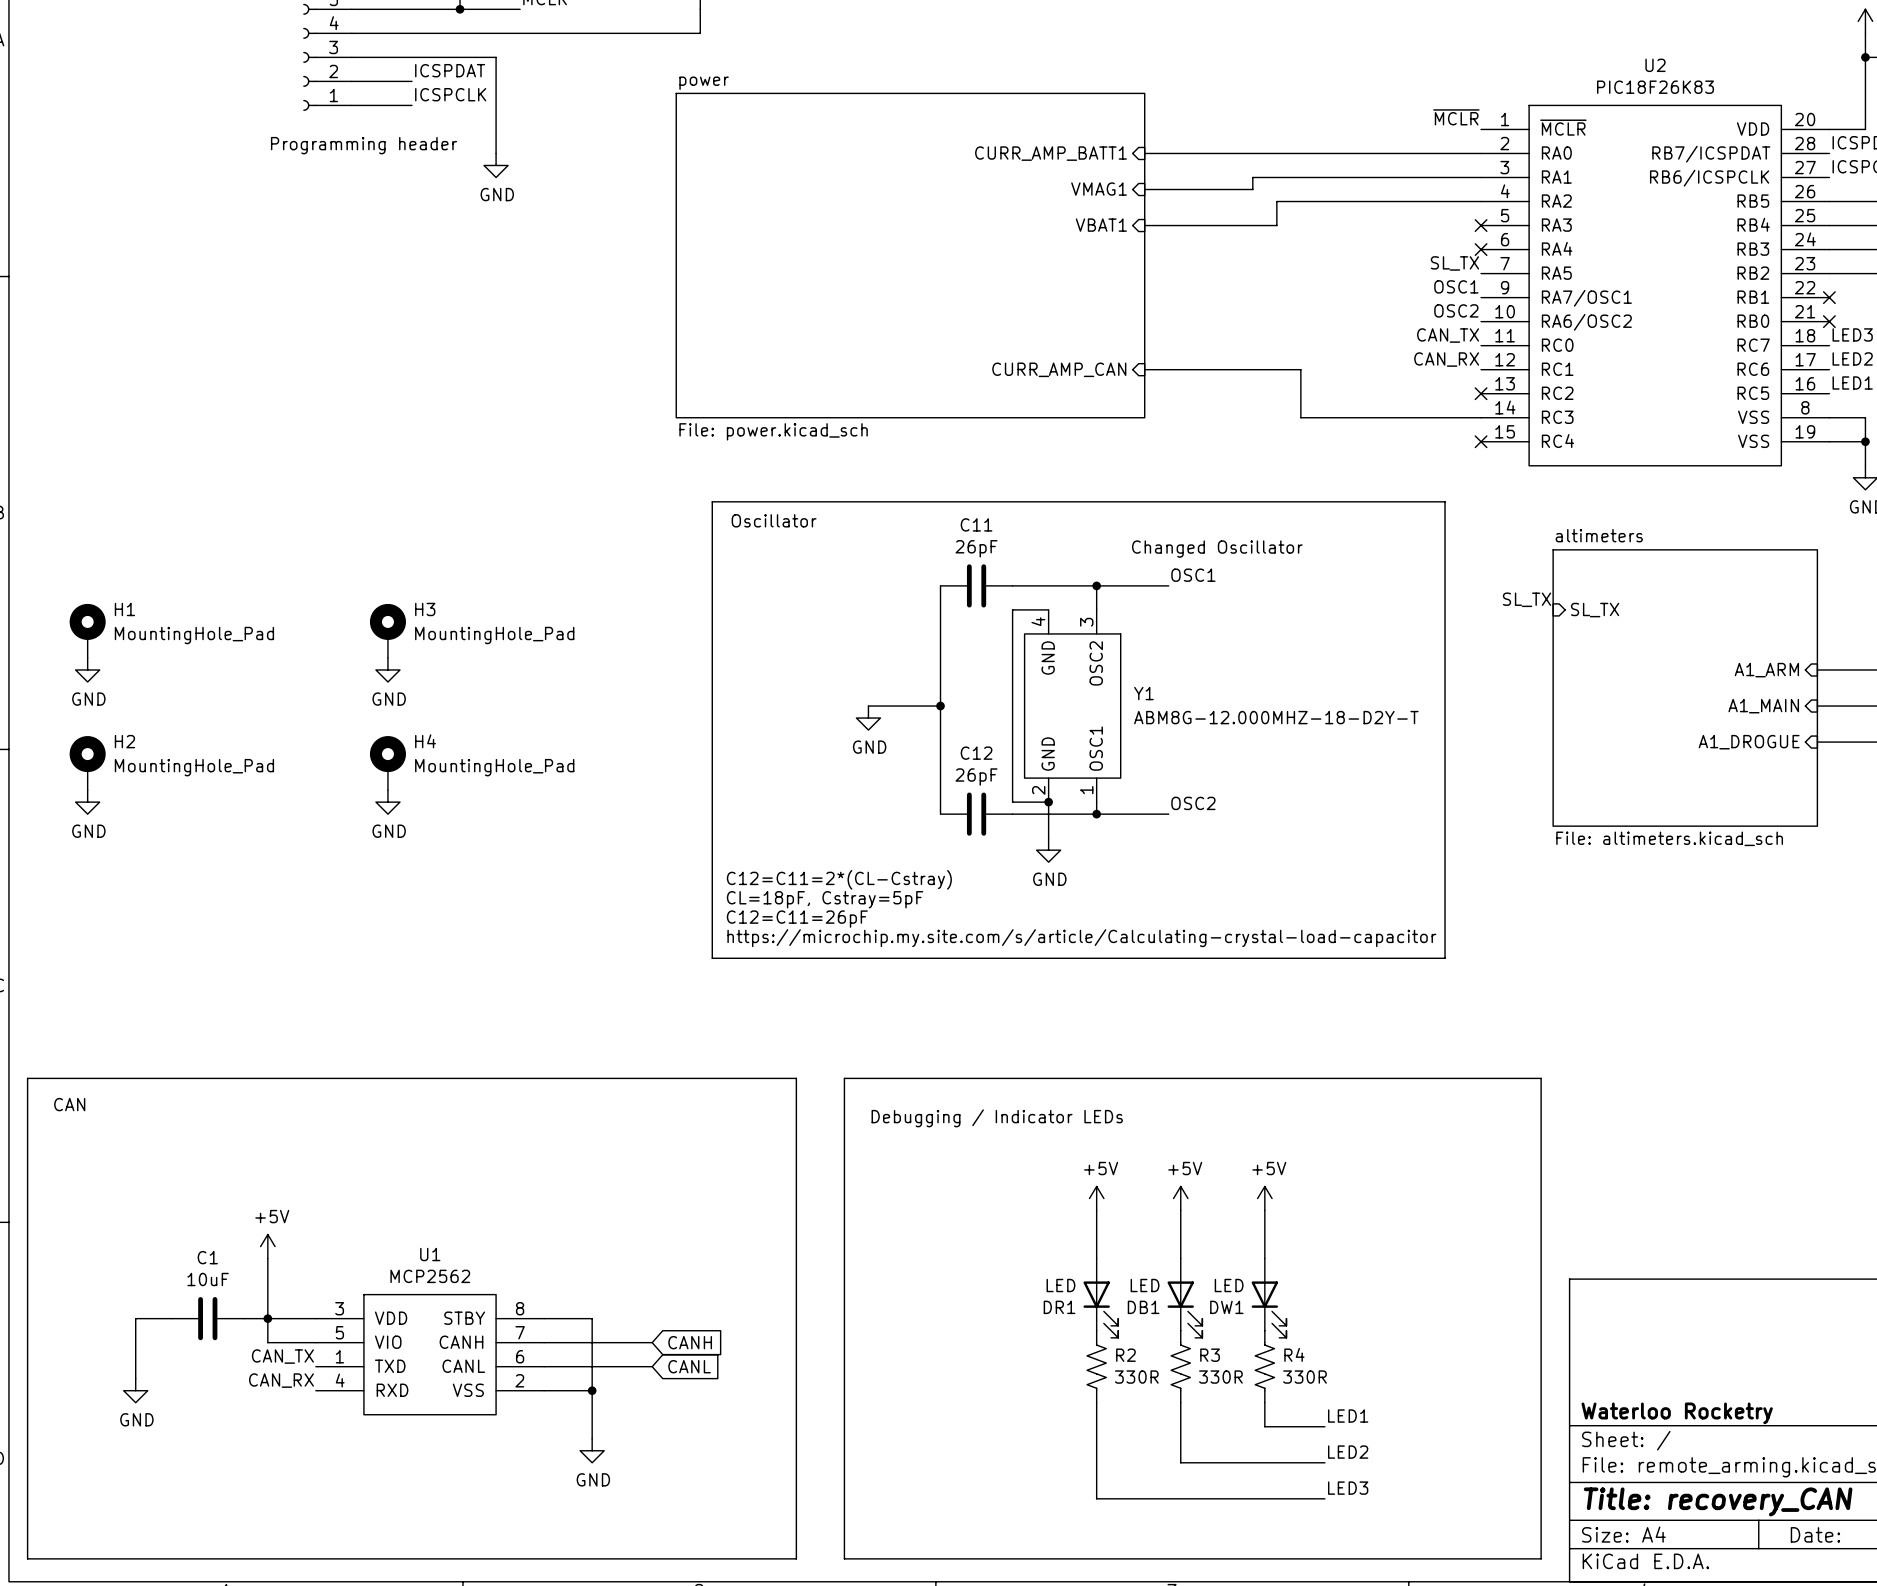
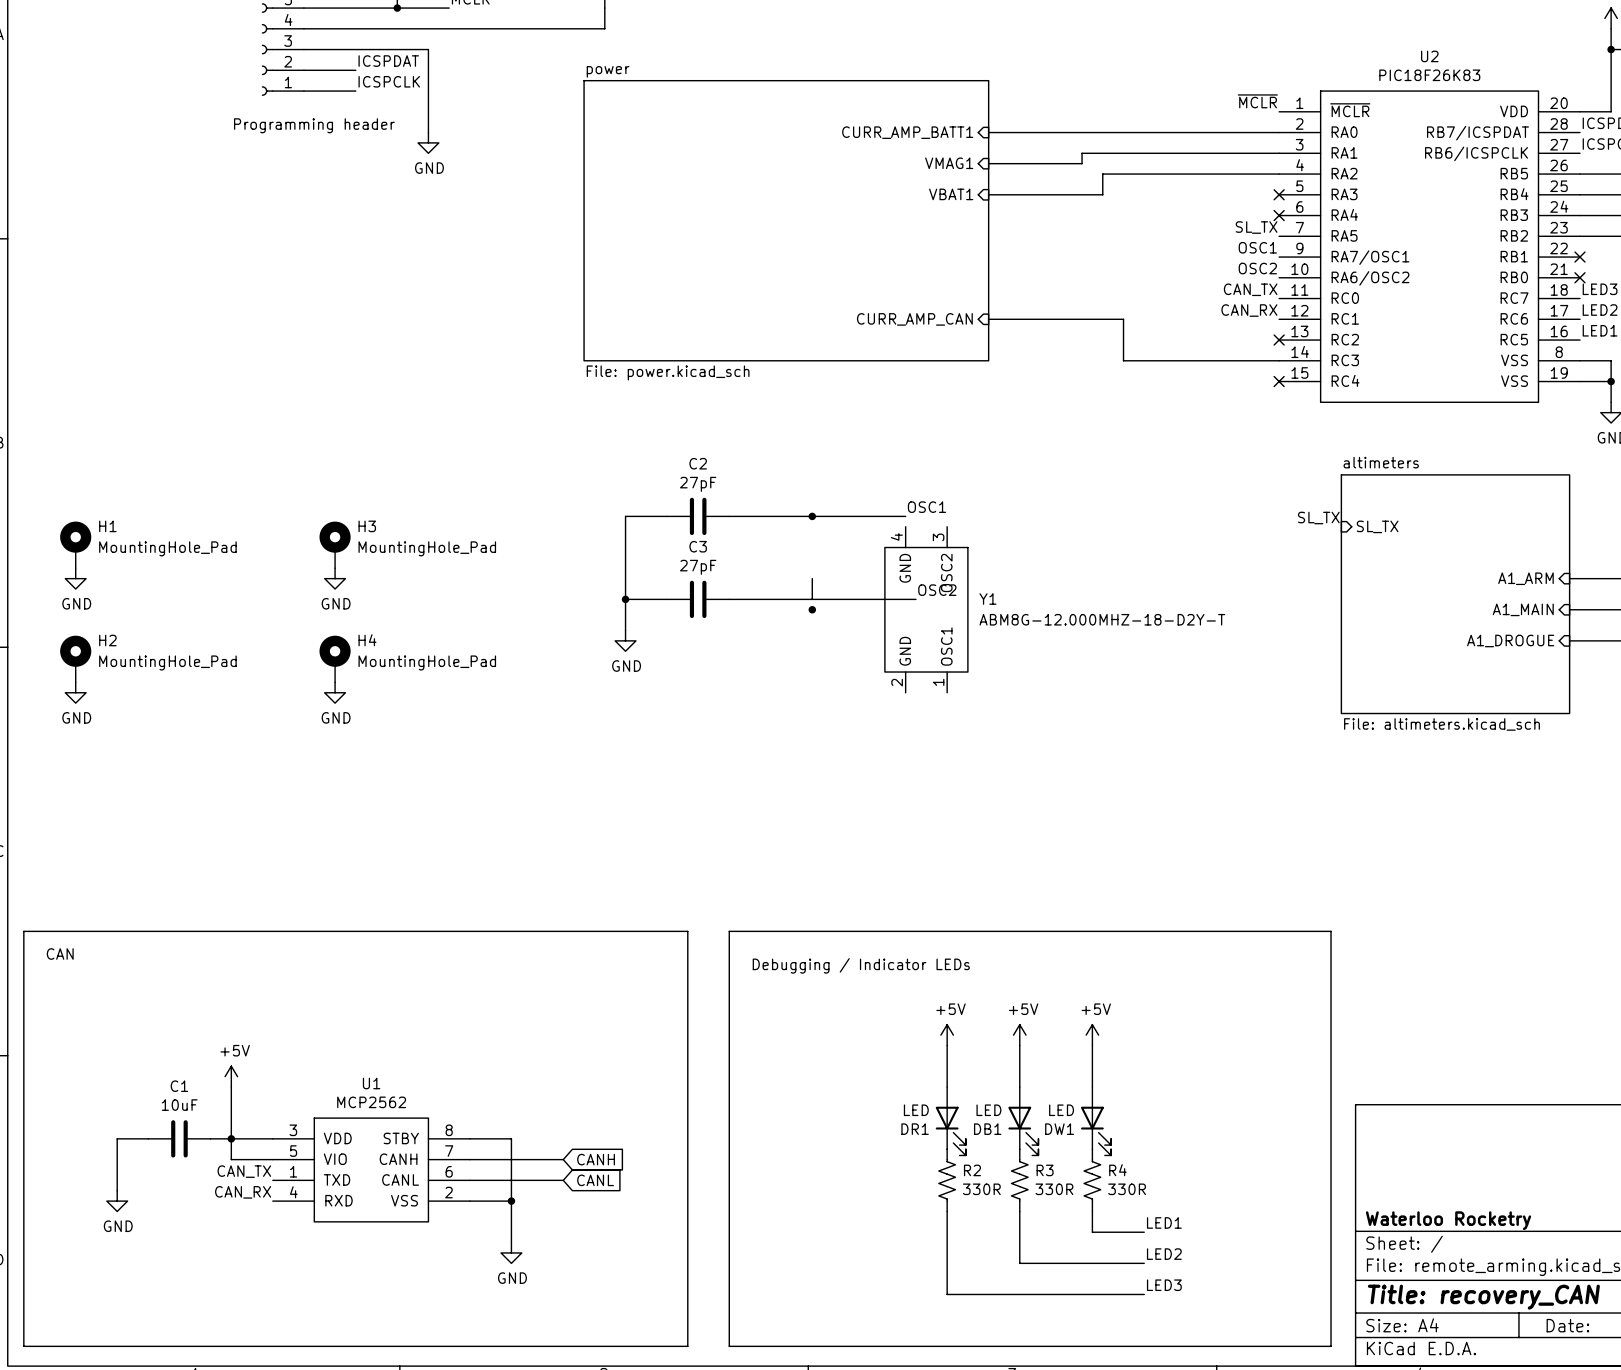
line: (712, 501) (1445, 501) (1445, 958) (712, 958) (712, 501) -> none
text: Oscillator (774, 520) -> none
text: Changed Oscillator (1217, 549) -> none
label position: OSC1 (1193, 575) -> OSC1 (926, 507)
wire: (940, 585) (940, 669) -> none
C11: 26pF (976, 585) -> none
wire: (1012, 585) (1168, 585) -> none
wire: (1096, 585) (1096, 609) -> none
junction: (1096, 585) -> none
wire: none -> (667, 516) (625, 516) (625, 630)
C2: none -> 27pF (698, 516)
wire: none -> (729, 516) (905, 516)
junction: none -> (812, 516)
wire: (1048, 609) (1012, 609) (1012, 802) (1048, 802) (1048, 838) -> none
wire: none -> (625, 599) (667, 599)
junction: none -> (625, 599)
C3: none -> 27pF (698, 599)
wire: none -> (729, 599) (916, 599)
wire: (940, 694) (940, 814) -> none
wire: (868, 706) (940, 706) -> none
power symbol position: GND (868, 718) -> GND (625, 640)
junction: (1048, 802) -> none
wire: (1096, 802) (1096, 814) -> none
label position: OSC2 (1193, 803) -> OSC2 (937, 590)
C12: 26pF (976, 814) -> none
wire: (1012, 814) (1168, 814) -> none
junction: (1096, 814) -> none
power symbol: GND (1048, 850) -> none
text: C12=C11=2*(CL-Cstray) (839, 879) -> none
text: CL=18pF, Cstray=5pF (825, 899) -> none
text: C12=C11=26pF (797, 919) -> none
text: https://microchip.my.site.com/s/article/Calculating-crystal-load-capacitor (1081, 938) -> none

